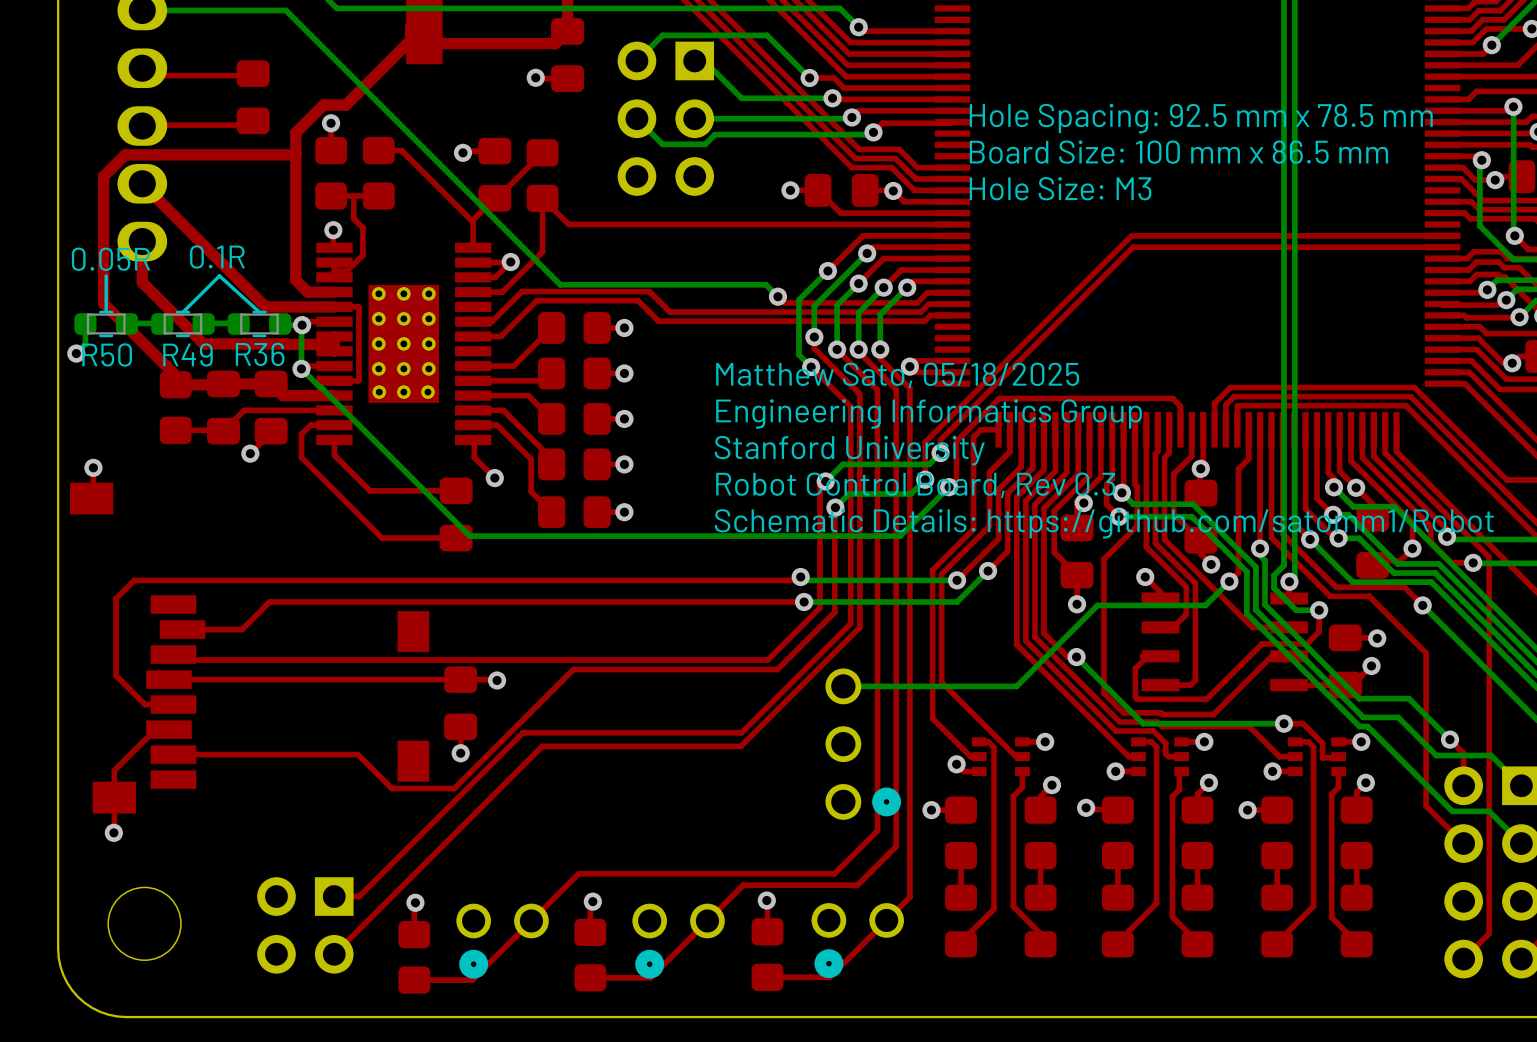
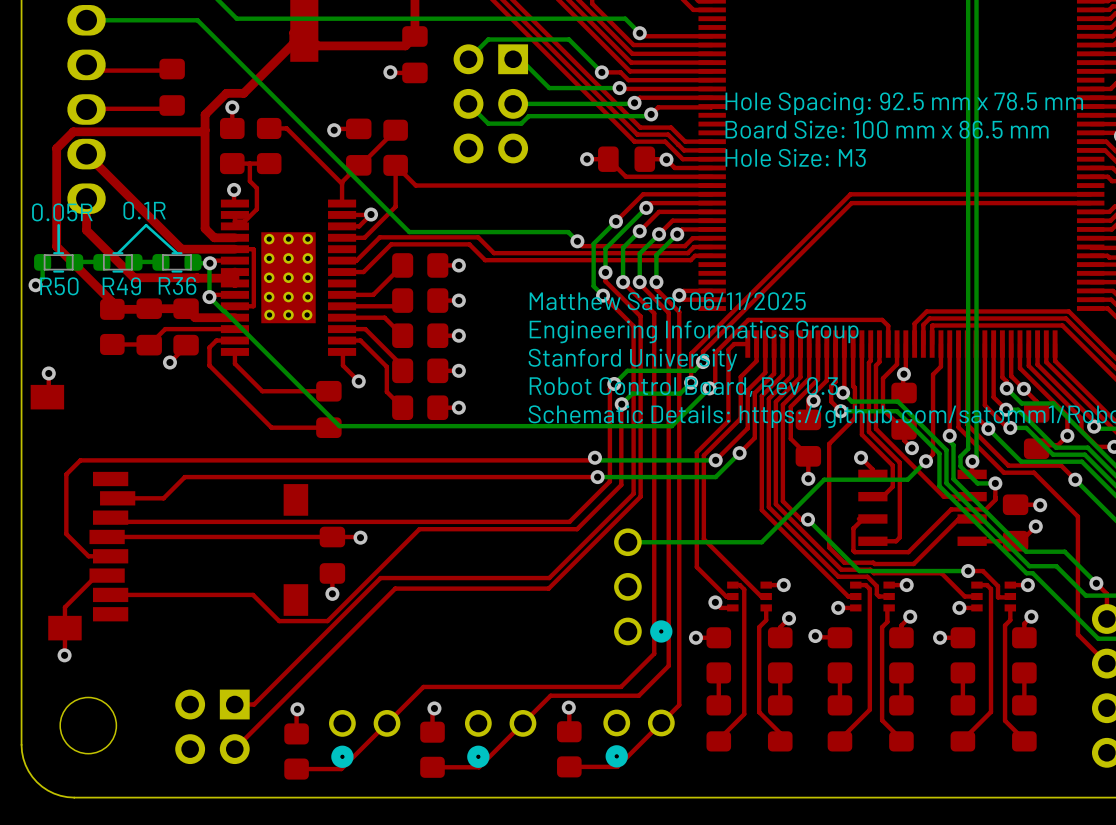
text: Matthew Sato, 05/18/2025 (897, 375) -> Matthew Sato, 06/11/2025 (667, 302)

